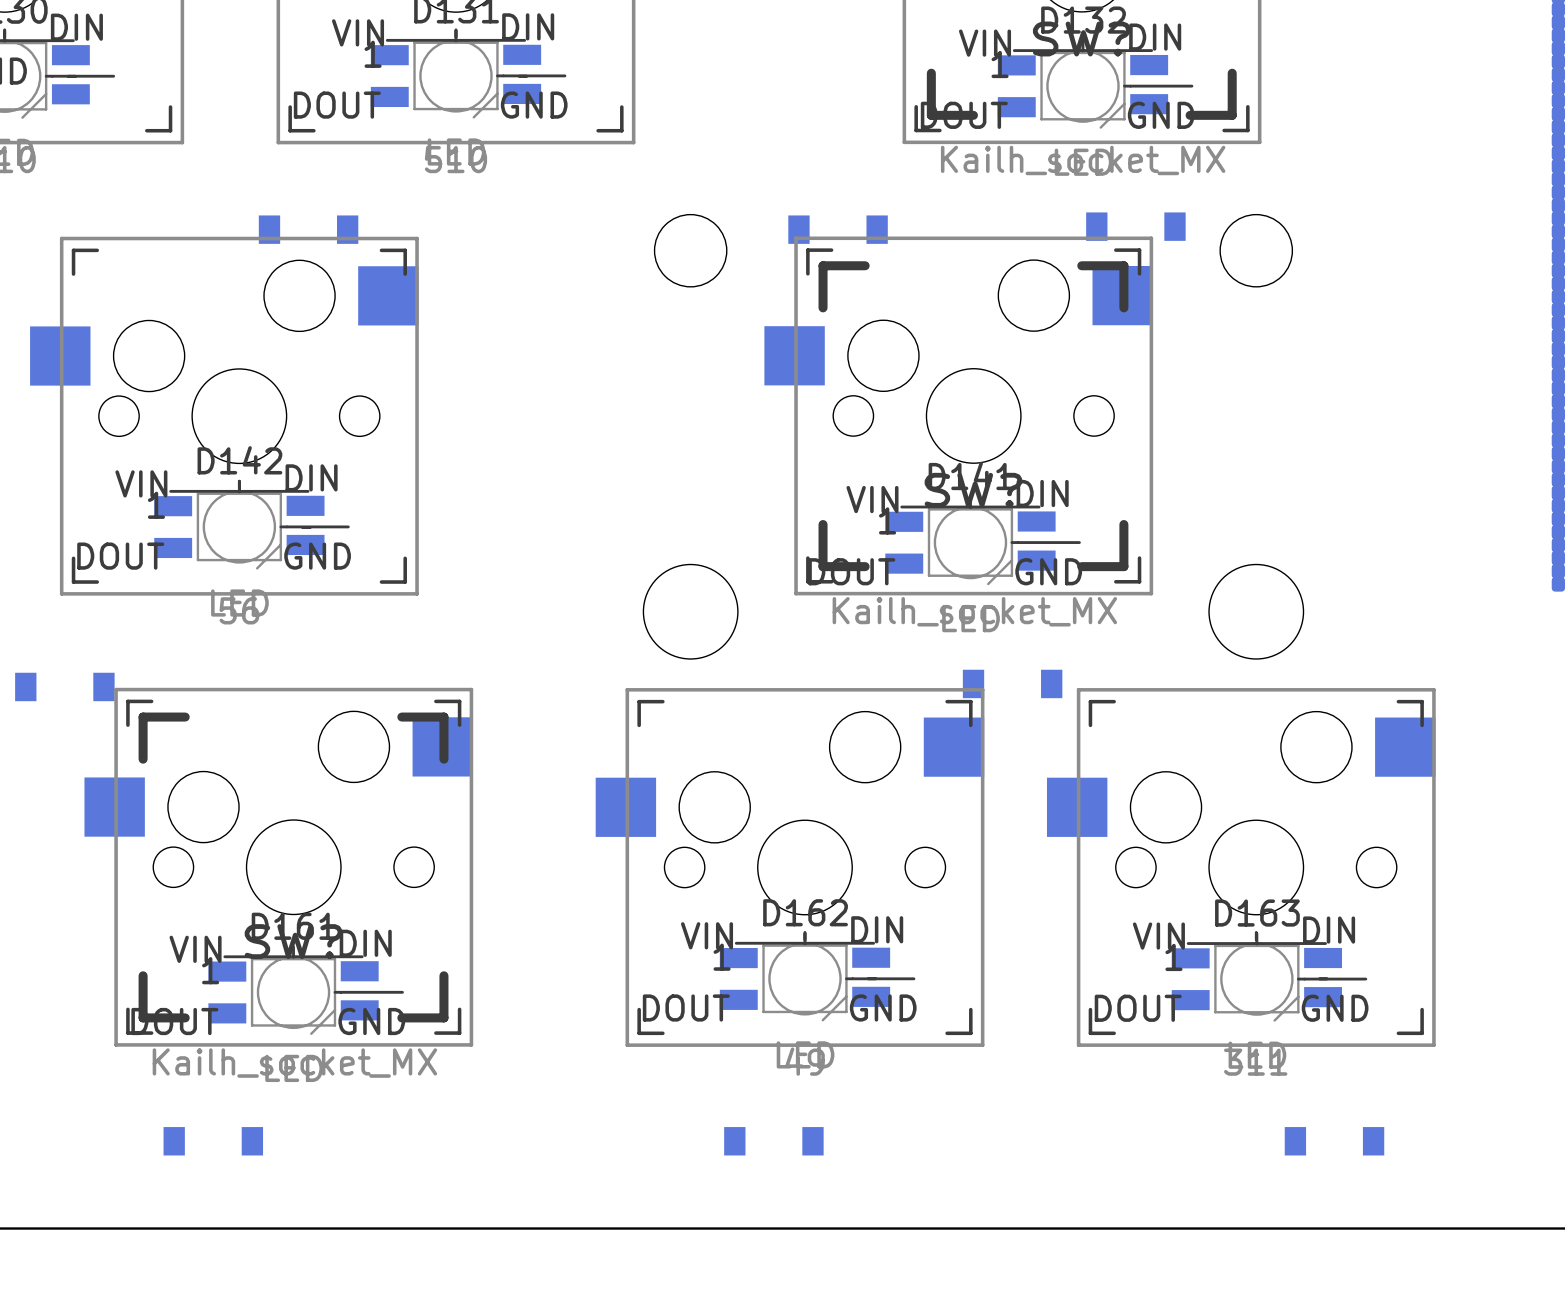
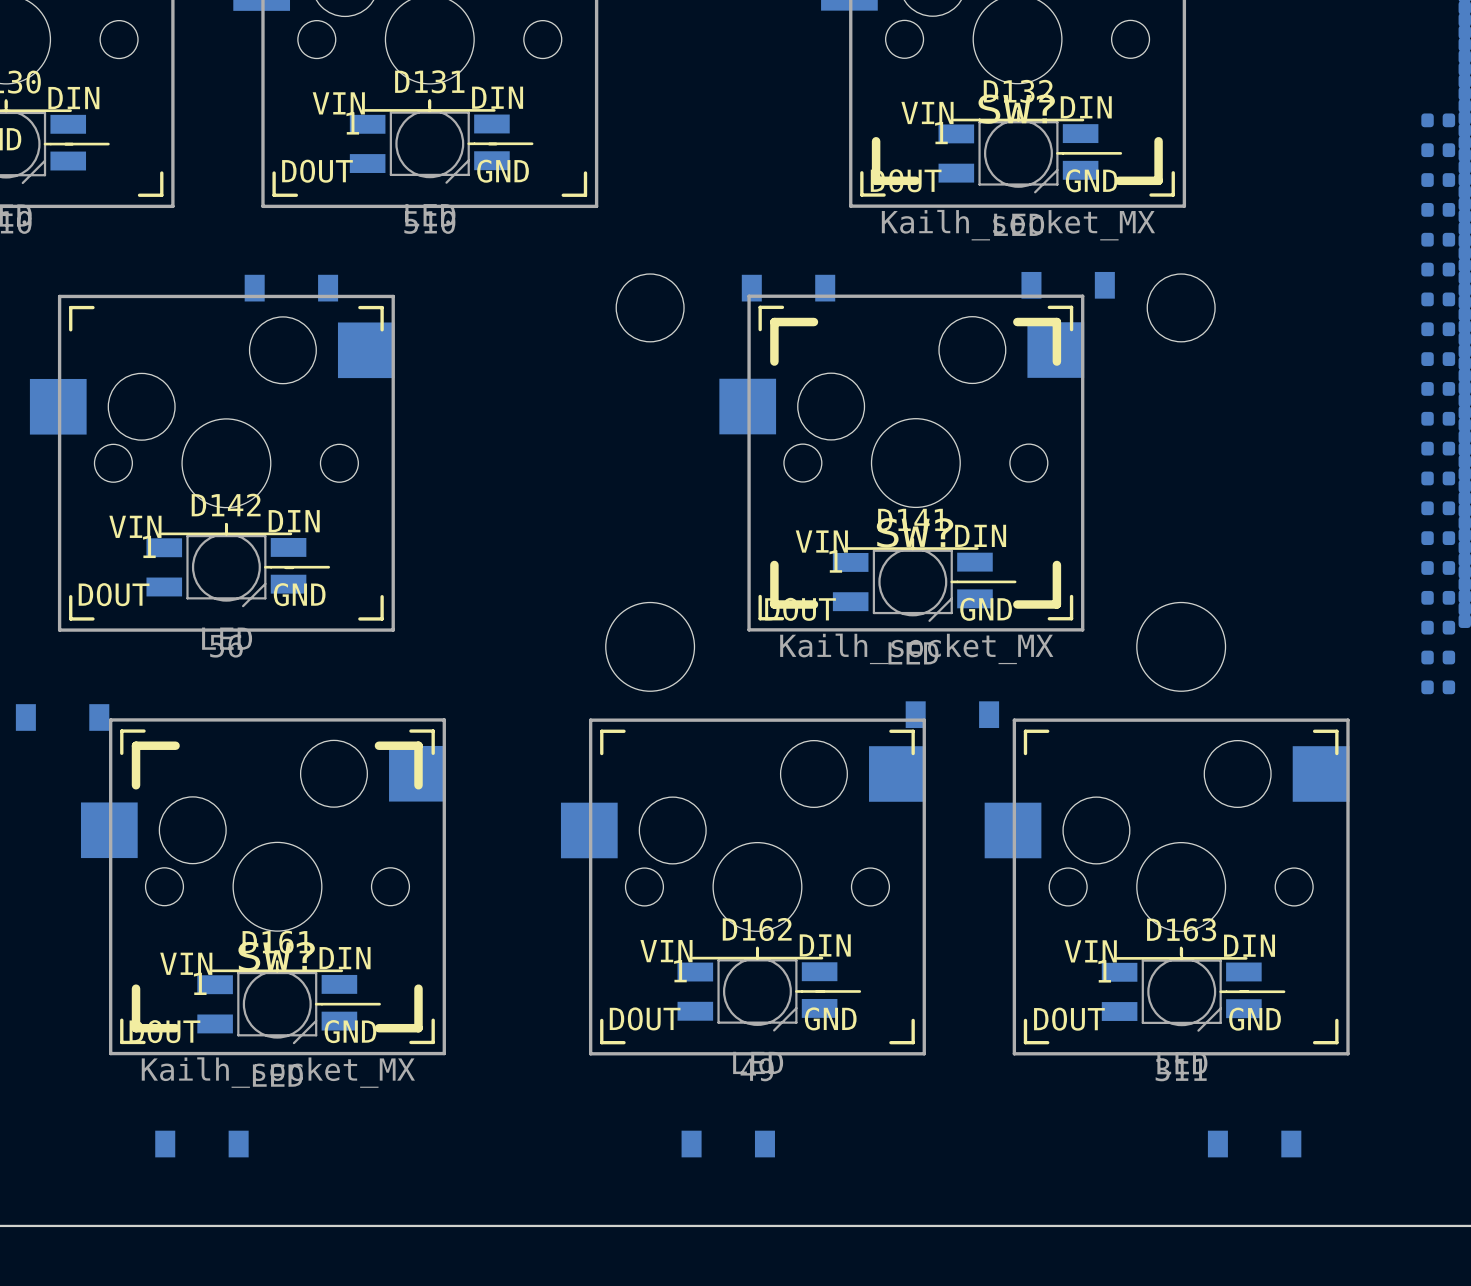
part: none -> (1438, 120)
part: none -> (1438, 150)
part: none -> (1438, 180)
part: none -> (1438, 209)
part: none -> (1438, 239)
part: none -> (1438, 269)
part: none -> (1438, 299)
part: none -> (1438, 329)
part: none -> (1438, 359)
part: none -> (1438, 388)
part: none -> (1438, 418)
part: none -> (1438, 448)
part: none -> (1438, 478)
part: none -> (1438, 508)
part: none -> (1438, 538)
part: none -> (1438, 567)
part: none -> (1438, 597)
part: none -> (1438, 627)
part: none -> (1438, 657)
part: none -> (1438, 687)

